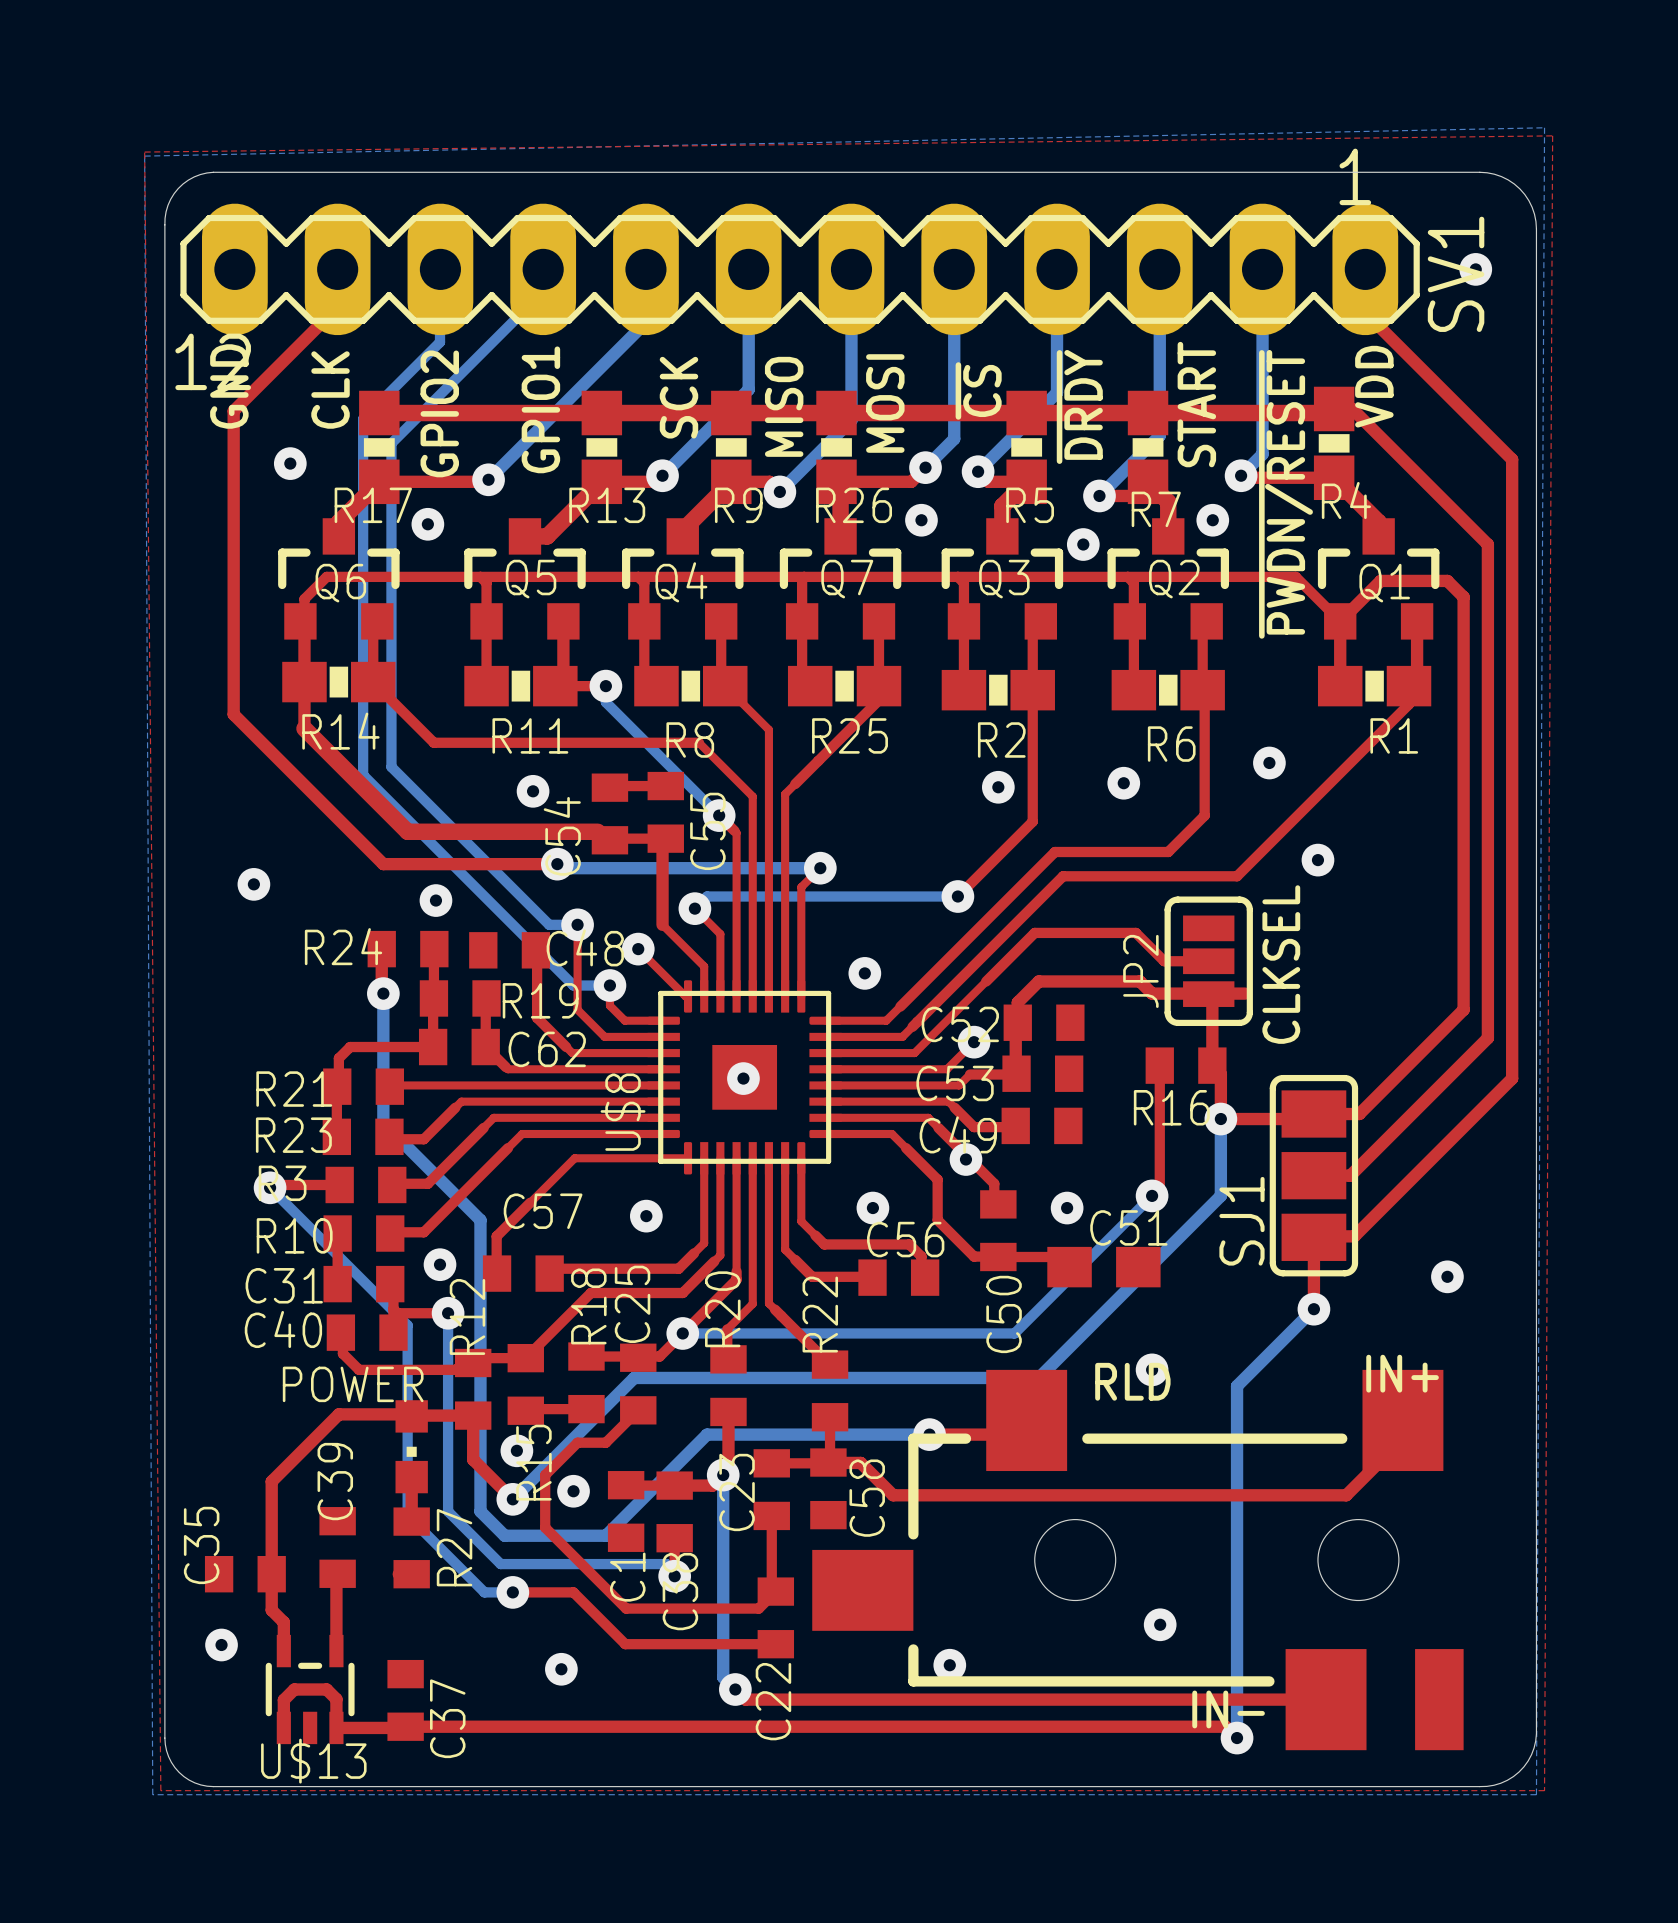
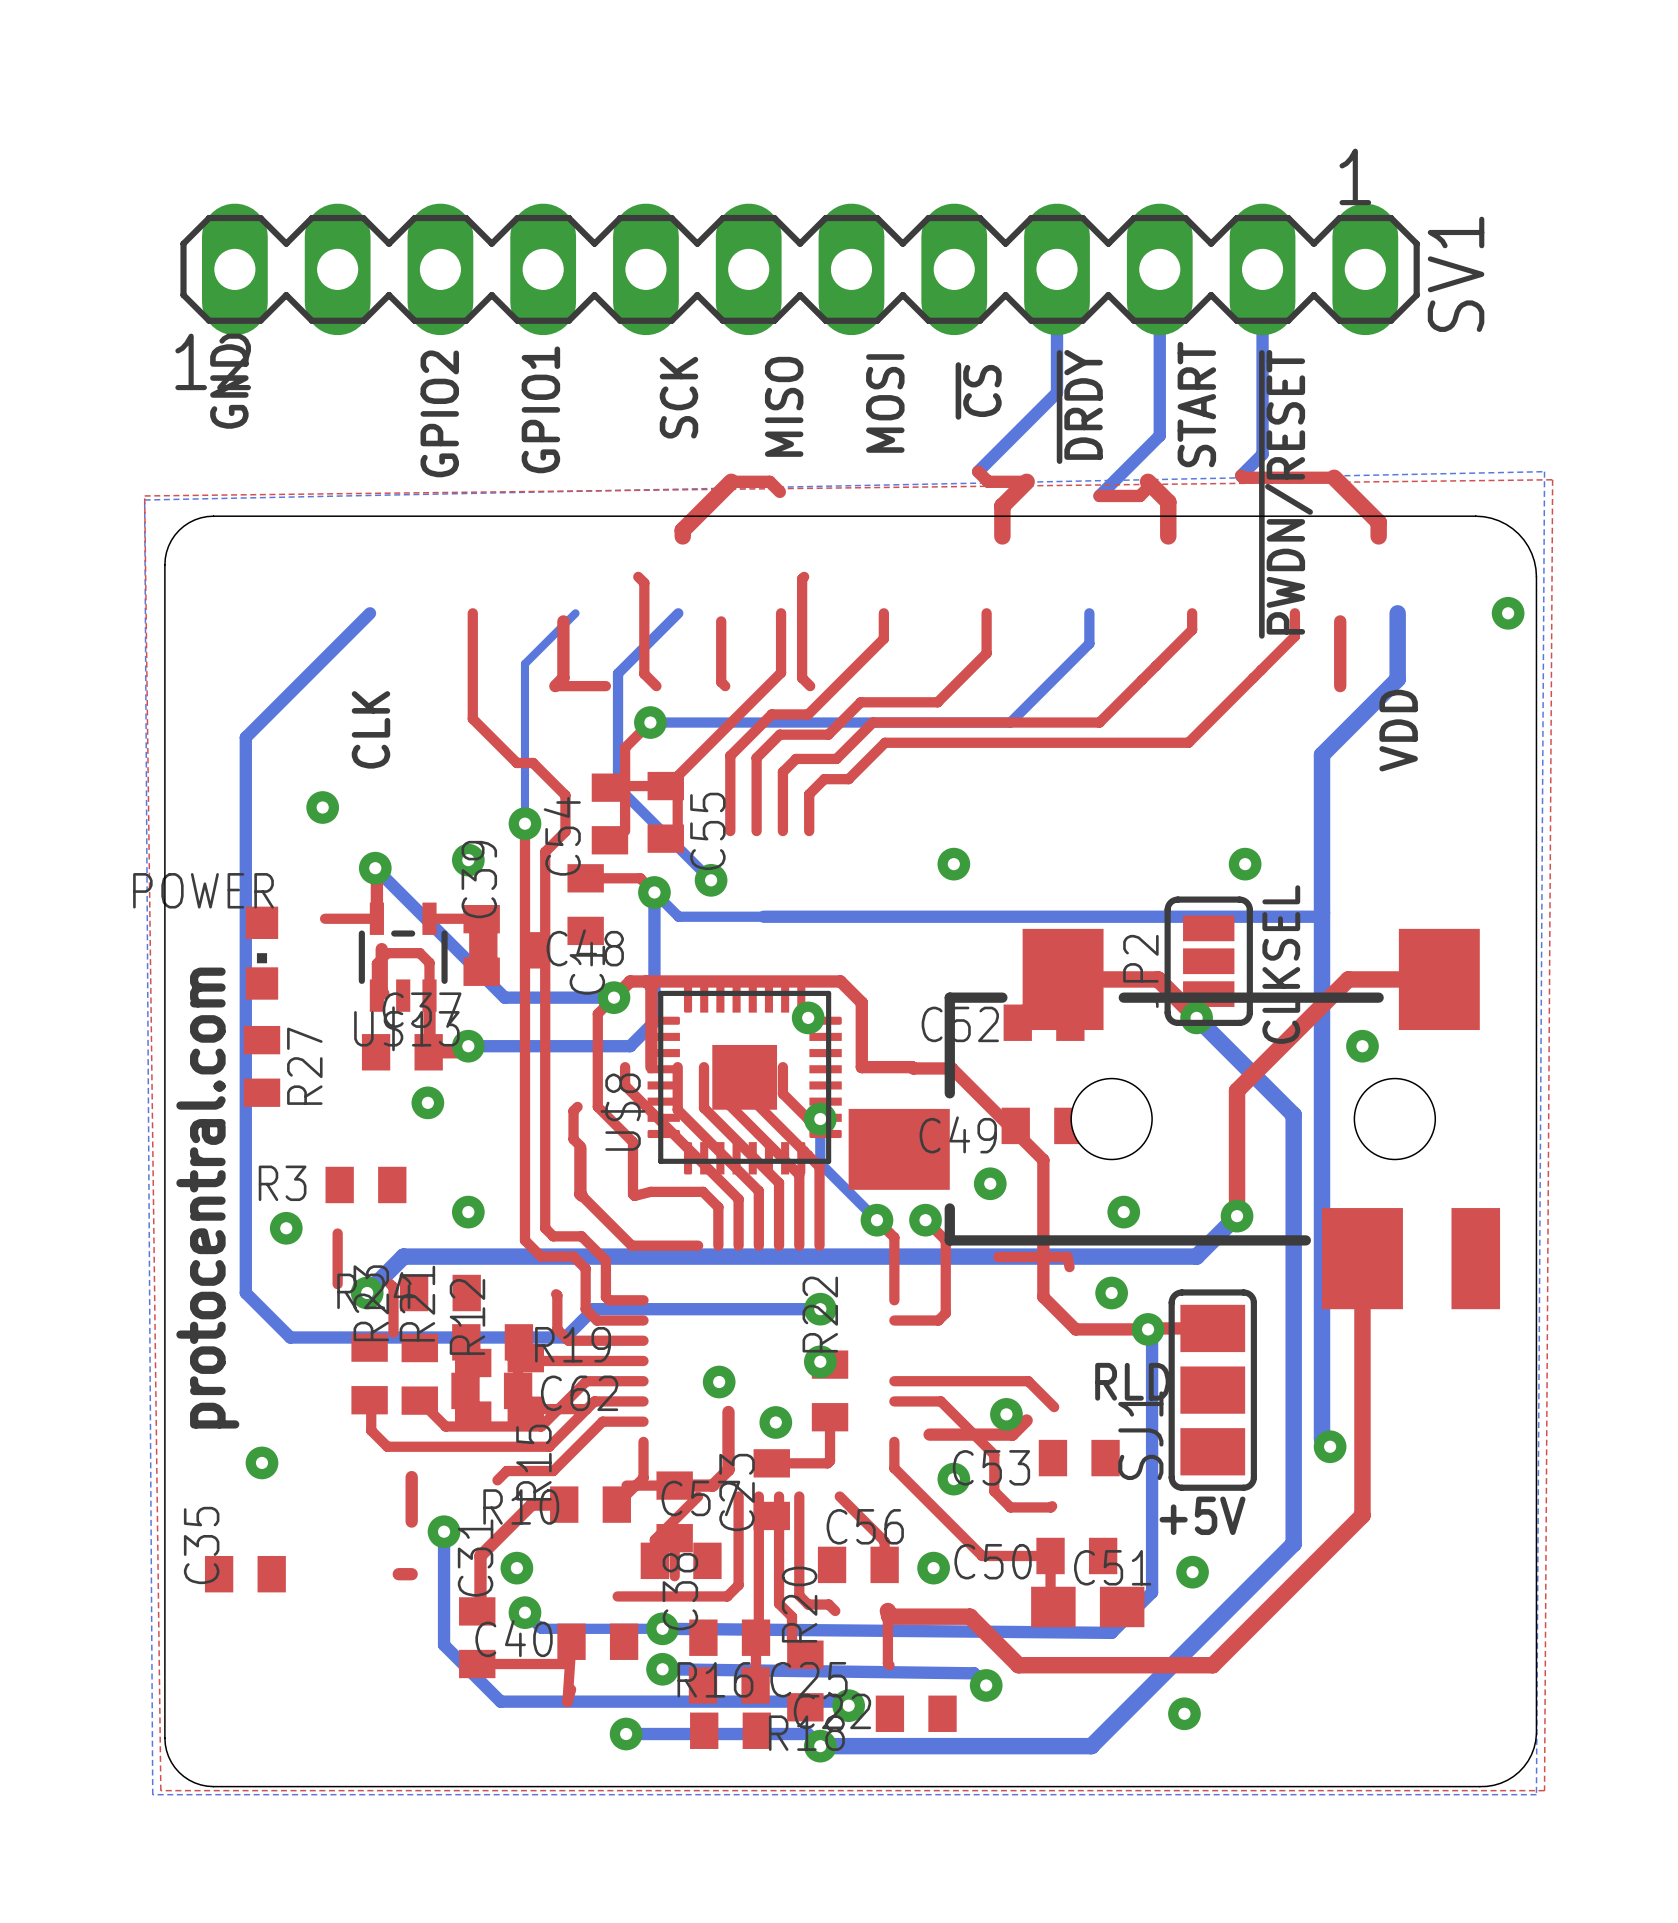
top track: (337, 269) (337, 307) (233, 411) (233, 714) (383, 864) (557, 864) -> none
bottom track: (440, 269) (440, 342) (363, 419) (363, 775) (573, 985) (609, 985) -> none
bottom track: (543, 269) (543, 291) (391, 443) (391, 767) (549, 924) (577, 924) -> none
bottom track: (645, 269) (645, 322) (488, 479) -> none
bottom track: (748, 269) (748, 389) (662, 475) -> none
bottom track: (851, 269) (851, 420) (779, 491) -> none
bottom track: (954, 269) (954, 438) (925, 467) -> none
top track: (1365, 269) (1365, 312) (1512, 459) (1512, 1078) (1354, 1236) (1313, 1237) (1313, 1309) -> none
via: (1475, 269) -> none
text position: VDD (1374, 386) -> VDD (1398, 730)
text position: CLK (330, 390) -> CLK (370, 729)
top track: (379, 413) (1330, 413) (1334, 408) (1352, 408) (1487, 544) (1487, 1038) (1350, 1175) (1313, 1175) -> none
R4: (1334, 443) -> none
R17: (379, 447) -> none
R13: (601, 447) -> none
R9: (731, 447) -> none
R26: (836, 447) -> none
R5: (1026, 447) -> none
R7: (1148, 447) -> none
via: (290, 463) -> none
top track: (925, 467) (911, 481) (836, 481) (840, 485) (840, 536) -> none
via: (925, 467) -> none
via: (978, 471) -> none
top track: (662, 475) (656, 481) (601, 481) (547, 536) (524, 536) -> none
via: (662, 475) -> none
via: (1241, 475) -> none
top track: (488, 479) (486, 481) (379, 481) (338, 522) (338, 536) -> none
via: (488, 479) -> none
via: (779, 491) -> none
via: (1099, 495) -> none
via: (921, 520) -> none
via: (1212, 520) -> none
via: (427, 524) -> none
via: (1083, 544) -> none
board edge: (164, 564) (165, 218) (167, 205) (174, 193) (183, 183) (200, 174) (213, 172) (1479, 172) (1494, 174) (1514, 184) (1528, 200) (1535, 221) (1536, 576) -> (164, 564) (168, 546) (179, 530) (194, 519) (213, 516) (1475, 516) (1498, 520) (1518, 533) (1531, 553) (1536, 576)
top track: (480, 576) (486, 582) (486, 686) -> none
top track: (957, 576) (963, 582) (963, 690) -> none
top track: (1127, 576) (1133, 582) (1133, 690) -> none
Q6: (338, 578) -> none
Q5: (524, 578) -> none
Q4: (682, 578) -> none
Q7: (840, 578) -> none
Q3: (1002, 578) -> none
Q2: (1168, 578) -> none
Q1: (1378, 578) -> none
bottom track: none -> (370, 613) (245, 737) (245, 1293) (290, 1337) (565, 1337) (593, 1309) (820, 1309)
top track: none -> (472, 613) (472, 718) (516, 762) (533, 762) (565, 795) (565, 831) (545, 852) (545, 1228) (553, 1236) (581, 1236) (605, 1260) (605, 1297) (609, 1300) (643, 1300)
bottom track: none -> (575, 613) (524, 663) (524, 823)
bottom track: none -> (678, 613) (618, 673) (618, 787) (711, 880)
top track: none -> (781, 613) (781, 672) (677, 776) (677, 831)
top track: none -> (883, 613) (883, 638) (808, 714) (771, 714) (730, 755) (730, 831)
top track: none -> (986, 613) (986, 653) (937, 702) (860, 702) (828, 734) (779, 734) (756, 757) (756, 831)
bottom track: none -> (1089, 613) (1089, 643) (1010, 722) (650, 722)
top track: none -> (1192, 613) (1192, 629) (1099, 722) (872, 722) (836, 758) (796, 758) (782, 772) (782, 831)
top track: none -> (1294, 613) (1294, 636) (1188, 742) (885, 742) (848, 779) (824, 779) (809, 794) (809, 831)
bottom track: none -> (1397, 613) (1397, 679) (1322, 754) (1322, 1438) (1330, 1446)
via: none -> (1508, 613)
top track: (377, 621) (373, 625) (373, 682) (433, 742) (698, 742) (752, 796) (752, 996) -> none
top track: (878, 621) (878, 686) (881, 688) (881, 698) (795, 784) -> none
top track: (1040, 621) (1032, 629) (1032, 821) (957, 896) -> none
top track: (1206, 621) (1202, 625) (1204, 815) (1168, 852) (1054, 852) (886, 1020) (825, 1020) -> none
top track: (1417, 621) (1417, 678) (1409, 686) (1409, 704) (1237, 876) (1063, 876) (912, 1026) -> none
top track: (304, 625) (304, 599) (326, 576) (1295, 576) (1340, 621) (1380, 580) (1447, 580) (1463, 597) (1463, 1009) (1359, 1114) (1313, 1114) (1308, 1119) (1220, 1119) (1220, 1074) (1212, 1065) (1212, 997) (1208, 993) -> none
top track: (304, 625) (304, 728) (407, 831) (597, 831) (605, 839) (609, 839) -> none
R14: (338, 682) -> none
R11: (520, 686) -> none
bottom track: (605, 686) (605, 702) (719, 815) -> none
via: (605, 686) -> none
R8: (690, 686) -> none
R25: (844, 686) -> none
R1: (1374, 686) -> none
top track: (719, 688) (725, 686) (768, 729) (768, 996) -> none
R2: (998, 690) -> none
R6: (1168, 690) -> none
top track: none -> (650, 722) (625, 747) (625, 831)
via: none -> (650, 722)
top track: (818, 760) (785, 794) (785, 996) -> none
via: (1269, 762) -> none
via: (1123, 783) -> none
via: (998, 787) -> none
via position: (533, 791) -> (524, 823)
via: none -> (322, 807)
top track: (719, 815) (736, 832) (736, 996) -> none
via: (719, 815) -> none
top track: none -> (524, 823) (524, 1240) (541, 1256) (573, 1256) (585, 1268) (585, 1309) (596, 1320) (643, 1320)
top track: (609, 840) (611, 838) (665, 838) (662, 841) (662, 924) (704, 966) (704, 996) -> none
via: none -> (468, 860)
via: (1317, 860) -> none
bottom track: (557, 864) (565, 868) (820, 868) -> none
via: (557, 864) -> none
via: none -> (1245, 864)
top track: none -> (375, 868) (376, 869) (376, 918) (325, 918)
bottom track: none -> (375, 868) (504, 997) (613, 997)
via: none -> (375, 868)
top track: (820, 868) (801, 887) (801, 996) -> none
via: (820, 868) -> none
top track: none -> (585, 878) (640, 878) (654, 892)
via: (253, 884) -> none
via: none -> (654, 892)
bottom track: (957, 896) (707, 896) (694, 908) -> none
via position: (957, 896) -> (953, 864)
via: (435, 900) -> none
top track: (694, 908) (720, 934) (720, 996) -> none
via position: (694, 908) -> (711, 880)
bottom track: none -> (1322, 912) (1317, 916) (678, 916) (654, 892) (654, 1021) (630, 1046) (468, 1046)
top track: none -> (429, 918) (485, 918) (481, 919)
top track: (577, 924) (577, 1009) (604, 1036) (663, 1036) -> none
via: (577, 924) -> none
R24 position: (408, 949) -> (440, 1293)
top track: (434, 949) (433, 945) (433, 1047) (350, 1047) (338, 1058) (336, 1136) -> none
top track: (638, 949) (685, 996) (688, 996) -> none
via: (638, 949) -> none
top track: (535, 950) (537, 943) (537, 1017) (572, 1053) (663, 1053) -> none
top track: (1208, 961) (1164, 961) (1135, 932) (1034, 932) (914, 1053) (825, 1053) -> none
via: (864, 973) -> none
top track: none -> (1063, 979) (1158, 979) (1196, 1017)
top track: none -> (1439, 979) (1348, 979) (1237, 1090) (1237, 1216)
top track: none -> (646, 981) (651, 986) (651, 1067)
top track: (609, 985) (609, 1005) (624, 1020) (663, 1020) -> none
via position: (609, 985) -> (613, 997)
bottom track: (383, 993) (383, 1123) (480, 1220) (480, 1511) (504, 1535) (605, 1535) (707, 1434) (929, 1434) -> none
via: (383, 993) -> none
top track: (1245, 993) (1152, 993) (1139, 981) (1038, 981) (1017, 1002) (1015, 1074) -> none
top track: none -> (376, 995) (376, 963) (387, 953) (419, 953) (429, 962) (428, 1052) (466, 1052) (468, 1046)
R19 position: (460, 998) -> (492, 1342)
top track: (486, 998) (485, 995) (485, 1047) (507, 1069) (663, 1069) -> none
via: none -> (808, 1017)
bottom track: none -> (1196, 1017) (1293, 1114) (1293, 1543) (1091, 1746) (820, 1746) (805, 1731) (802, 1734) (626, 1734)
via: none -> (1196, 1017)
top track: (917, 1021) (902, 1036) (825, 1036) -> none
top track: (974, 1042) (946, 1069) (825, 1069) -> none
via: (974, 1042) -> none
via: none -> (468, 1046)
via: none -> (1362, 1046)
C62 position: (459, 1047) -> (491, 1390)
top track: (1159, 1065) (1159, 1188) (1152, 1195) -> none
R16 position: (1186, 1065) -> (729, 1637)
top track: none -> (625, 1067) (625, 1085) (738, 1199) (738, 1245)
top track: none -> (677, 1067) (677, 1109) (758, 1191) (758, 1245)
top track: none -> (704, 1067) (704, 1107) (779, 1182) (779, 1245)
top track: none -> (730, 1067) (730, 1105) (799, 1174) (799, 1245)
top track: none -> (756, 1067) (756, 1103) (819, 1166) (819, 1245)
top track: none -> (782, 1067) (782, 1093) (808, 1119) (820, 1119)
C53 position: (1042, 1073) -> (1079, 1458)
top track: (1015, 1074) (970, 1074) (959, 1085) (825, 1085) -> none
via: (743, 1078) -> none
top track: (663, 1085) (391, 1085) (390, 1087) -> none
R21 rotation: 0° (363, 1086) -> 90° clockwise (419, 1374)
R21 position: (363, 1086) -> (419, 1374)
top track: (663, 1101) (461, 1101) (423, 1139) (391, 1139) (389, 1136) -> none
top track: (825, 1101) (948, 1101) (974, 1127) (1015, 1125) -> none
via: none -> (427, 1102)
top track: none -> (577, 1106) (573, 1110) (573, 1139) (580, 1146) (580, 1194) (631, 1245) (698, 1245)
top track: (663, 1117) (493, 1117) (427, 1183) (392, 1184) -> none
top track: (825, 1117) (928, 1117) (994, 1183) (994, 1200) (998, 1204) -> none
bottom track: none -> (820, 1119) (820, 1163) (876, 1220)
via: none -> (820, 1119)
bottom track: (1220, 1119) (1220, 1195) (1038, 1377) (634, 1377) (512, 1499) -> none
via: (1220, 1119) -> none
top track: (663, 1134) (522, 1134) (423, 1232) (390, 1233) -> none
top track: (825, 1134) (891, 1134) (937, 1179) (937, 1220) (974, 1256) (997, 1256) -> none
R23 rotation: 0° (363, 1136) -> 90° clockwise (369, 1373)
R23 position: (363, 1136) -> (369, 1373)
top track: (688, 1158) (574, 1158) (496, 1236) (496, 1273) -> none
top track: (704, 1158) (704, 1243) (678, 1268) (554, 1268) (549, 1273) -> none
top track: (720, 1158) (720, 1255) (682, 1293) (590, 1293) (525, 1358) (476, 1358) (473, 1363) (471, 1354) (456, 1369) (359, 1369) (342, 1353) (342, 1334) (340, 1332) -> none
top track: (736, 1158) (736, 1279) (659, 1356) (586, 1356) -> none
top track: (752, 1158) (752, 1303) (727, 1329) (728, 1359) -> none
top track: (768, 1158) (768, 1303) (781, 1315) -> none
top track: (785, 1158) (785, 1249) (812, 1276) (872, 1277) -> none
top track: (801, 1158) (801, 1221) (824, 1244) (909, 1244) (921, 1256) (921, 1273) (925, 1277) -> none
via position: (965, 1159) -> (990, 1183)
SJ1 position: (1313, 1175) -> (1212, 1390)
top track: (339, 1184) (272, 1184) (270, 1187) -> none
bottom track: (270, 1187) (407, 1325) (407, 1515) (484, 1592) (512, 1592) -> none
via position: (270, 1187) -> (286, 1228)
bottom track: (1152, 1195) (1014, 1333) (682, 1333) -> none
via position: (1152, 1195) -> (1123, 1212)
text: none -> protocentral.com (207, 1198)
via position: (872, 1208) -> (876, 1220)
via: (1067, 1208) -> none
via: none -> (468, 1212)
via: (646, 1216) -> none
bottom track: none -> (1237, 1216) (1196, 1256) (403, 1256) (367, 1293)
via: none -> (1237, 1216)
top track: none -> (876, 1220) (894, 1237) (894, 1300)
top track: none -> (925, 1220) (945, 1240) (945, 1313) (938, 1320) (894, 1320)
via: none -> (925, 1220)
C50 rotation: 0° (998, 1230) -> 90° clockwise (1076, 1555)
C50 position: (998, 1230) -> (1076, 1555)
R10 position: (363, 1233) -> (590, 1504)
top track: none -> (718, 1245) (718, 1207) (702, 1191) (650, 1191) (634, 1195) (633, 1194) (633, 1142) (597, 1106) (597, 1013) (630, 981) (840, 981) (861, 1002) (861, 1067) (951, 1068) (1043, 1160) (1043, 1297) (1075, 1329) (1212, 1328)
top track: none -> (1362, 1258) (1362, 1515) (1212, 1665) (1018, 1665) (970, 1616) (889, 1616) (887, 1611) (887, 1663) (889, 1665)
via: (440, 1264) -> none
C51 position: (1103, 1267) -> (1087, 1606)
C57 position: (523, 1273) -> (681, 1560)
via: (1447, 1276) -> none
C56 position: (898, 1277) -> (858, 1564)
C31 rotation: 0° (363, 1284) -> 90° clockwise (477, 1637)
C31 position: (363, 1284) -> (477, 1637)
via: none -> (367, 1293)
via: none -> (1111, 1293)
top track: none -> (556, 1294) (557, 1329) (568, 1340) (643, 1340)
top track: (393, 1309) (397, 1313) (448, 1313) -> none
top track: (775, 1309) (830, 1364) -> none
via: none -> (820, 1309)
bottom track: (1313, 1309) (1237, 1386) (1237, 1738) -> none
via: (1313, 1309) -> none
bottom track: (448, 1313) (448, 1511) (500, 1564) (666, 1564) (674, 1572) (674, 1576) -> none
via: (448, 1313) -> none
bottom track: none -> (1148, 1329) (1152, 1333) (1152, 1592) (1111, 1632) (541, 1628) (524, 1612)
C40 position: (367, 1332) -> (597, 1641)
via: (682, 1333) -> none
top track: none -> (643, 1360) (537, 1360) (518, 1342) (518, 1339) (518, 1390)
via: none -> (820, 1361)
via position: (1152, 1369) -> (1148, 1329)
text: IN+ (1402, 1373) -> none
top track: none -> (643, 1381) (586, 1381) (541, 1426) (445, 1426) (419, 1400)
top track: none -> (894, 1381) (1028, 1381) (1054, 1407)
R18 rotation: 0° (586, 1382) -> 90° clockwise (730, 1730)
R18 position: (586, 1382) -> (730, 1730)
via: none -> (719, 1382)
C25 rotation: 0° (638, 1384) -> 90° clockwise (729, 1685)
C25 position: (638, 1384) -> (729, 1685)
R20 position: (728, 1385) -> (805, 1681)
top track: none -> (369, 1400) (371, 1401) (371, 1430) (387, 1446) (549, 1446) (594, 1401) (643, 1401)
top track: none -> (894, 1401) (940, 1401) (994, 1454) (994, 1491) (1010, 1507) (1052, 1506)
top track: (638, 1410) (605, 1442) (577, 1442) (545, 1475) (545, 1527) (626, 1608) (758, 1608) (775, 1591) (771, 1587) (771, 1515) -> none
via: none -> (1006, 1414)
top track: (1402, 1420) (1402, 1438) (1346, 1495) (893, 1495) (860, 1462) (828, 1462) -> none
top track: none -> (643, 1421) (602, 1421) (553, 1471) (506, 1471) (497, 1480)
via: none -> (775, 1422)
via: (929, 1434) -> none
top track: none -> (643, 1441) (643, 1477) (616, 1504)
top track: none -> (894, 1441) (894, 1468) (982, 1555) (1050, 1555) (1050, 1604) (1053, 1606)
POWER position: (411, 1446) -> (261, 953)
via: none -> (1330, 1446)
via: (516, 1450) -> none
via: none -> (261, 1462)
bottom track: (723, 1475) (723, 1677) (735, 1689) -> none
via: (723, 1475) -> none
via: none -> (953, 1479)
C58: (828, 1488) -> none
via: (573, 1491) -> none
top track: none -> (698, 1496) (654, 1539) (654, 1560)
top track: none -> (738, 1496) (738, 1585) (727, 1596) (617, 1596)
top track: none -> (758, 1496) (758, 1634) (755, 1637) (755, 1685)
top track: none -> (779, 1496) (779, 1603) (792, 1616) (792, 1641) (805, 1654)
top track: none -> (799, 1496) (799, 1595) (808, 1604) (828, 1604) (835, 1611)
top track: none -> (839, 1496) (884, 1541) (884, 1564)
top track: (512, 1499) (473, 1459) (473, 1415) (338, 1414) (271, 1481) (271, 1610) (283, 1622) (283, 1651) -> none
via: (512, 1499) -> none
top track: none -> (564, 1504) (531, 1504) (480, 1555) (480, 1608) (477, 1611)
C1 position: (626, 1511) -> (585, 904)
text: none -> +5V (1202, 1515)
bottom track: none -> (444, 1531) (444, 1645) (500, 1701) (844, 1701) (848, 1705)
via: none -> (444, 1531)
C39 position: (337, 1547) -> (481, 945)
R27 position: (411, 1547) -> (261, 1066)
part position: (1137, 1560) -> (1174, 1119)
via: none -> (516, 1568)
via: none -> (933, 1568)
via: none -> (1192, 1572)
top track: (337, 1573) (336, 1651) -> none
via: (674, 1576) -> none
top track: (512, 1592) (573, 1592) (625, 1644) (775, 1644) -> none
via: (512, 1592) -> none
via: none -> (524, 1612)
C22 rotation: 0° (775, 1617) -> 90° clockwise (916, 1713)
C22 position: (775, 1617) -> (916, 1713)
via: (1160, 1624) -> none
via: none -> (662, 1628)
via: (221, 1645) -> none
top track: none -> (477, 1664) (565, 1664) (571, 1641) (567, 1702) (571, 1689)
via position: (949, 1665) -> (986, 1685)
via: (561, 1669) -> none
bottom track: none -> (662, 1669) (974, 1673) (986, 1685)
via: none -> (662, 1669)
U$13 position: (310, 1689) -> (403, 957)
top track: (735, 1689) (745, 1699) (1326, 1699) -> none
via: (735, 1689) -> none
C37 rotation: 0° (405, 1700) -> 90° clockwise (402, 1052)
C37 position: (405, 1700) -> (402, 1052)
via: none -> (848, 1705)
text: IN- (1228, 1709) -> none
via: none -> (1184, 1713)
top track: (283, 1727) (283, 1700) (294, 1689) (326, 1689) (336, 1699) (336, 1727) (1225, 1726) (1237, 1738) -> none
via: none -> (626, 1734)
via: (1237, 1738) -> none
via: none -> (820, 1746)
top zone outline: (160, 1790) (144, 152) (1552, 135) (1544, 1790) -> (160, 1790) (144, 495) (1552, 479) (1544, 1790)
bottom zone outline: (152, 1794) (144, 156) (1544, 127) (1536, 1794) -> (152, 1794) (144, 500) (1544, 471) (1536, 1794)

